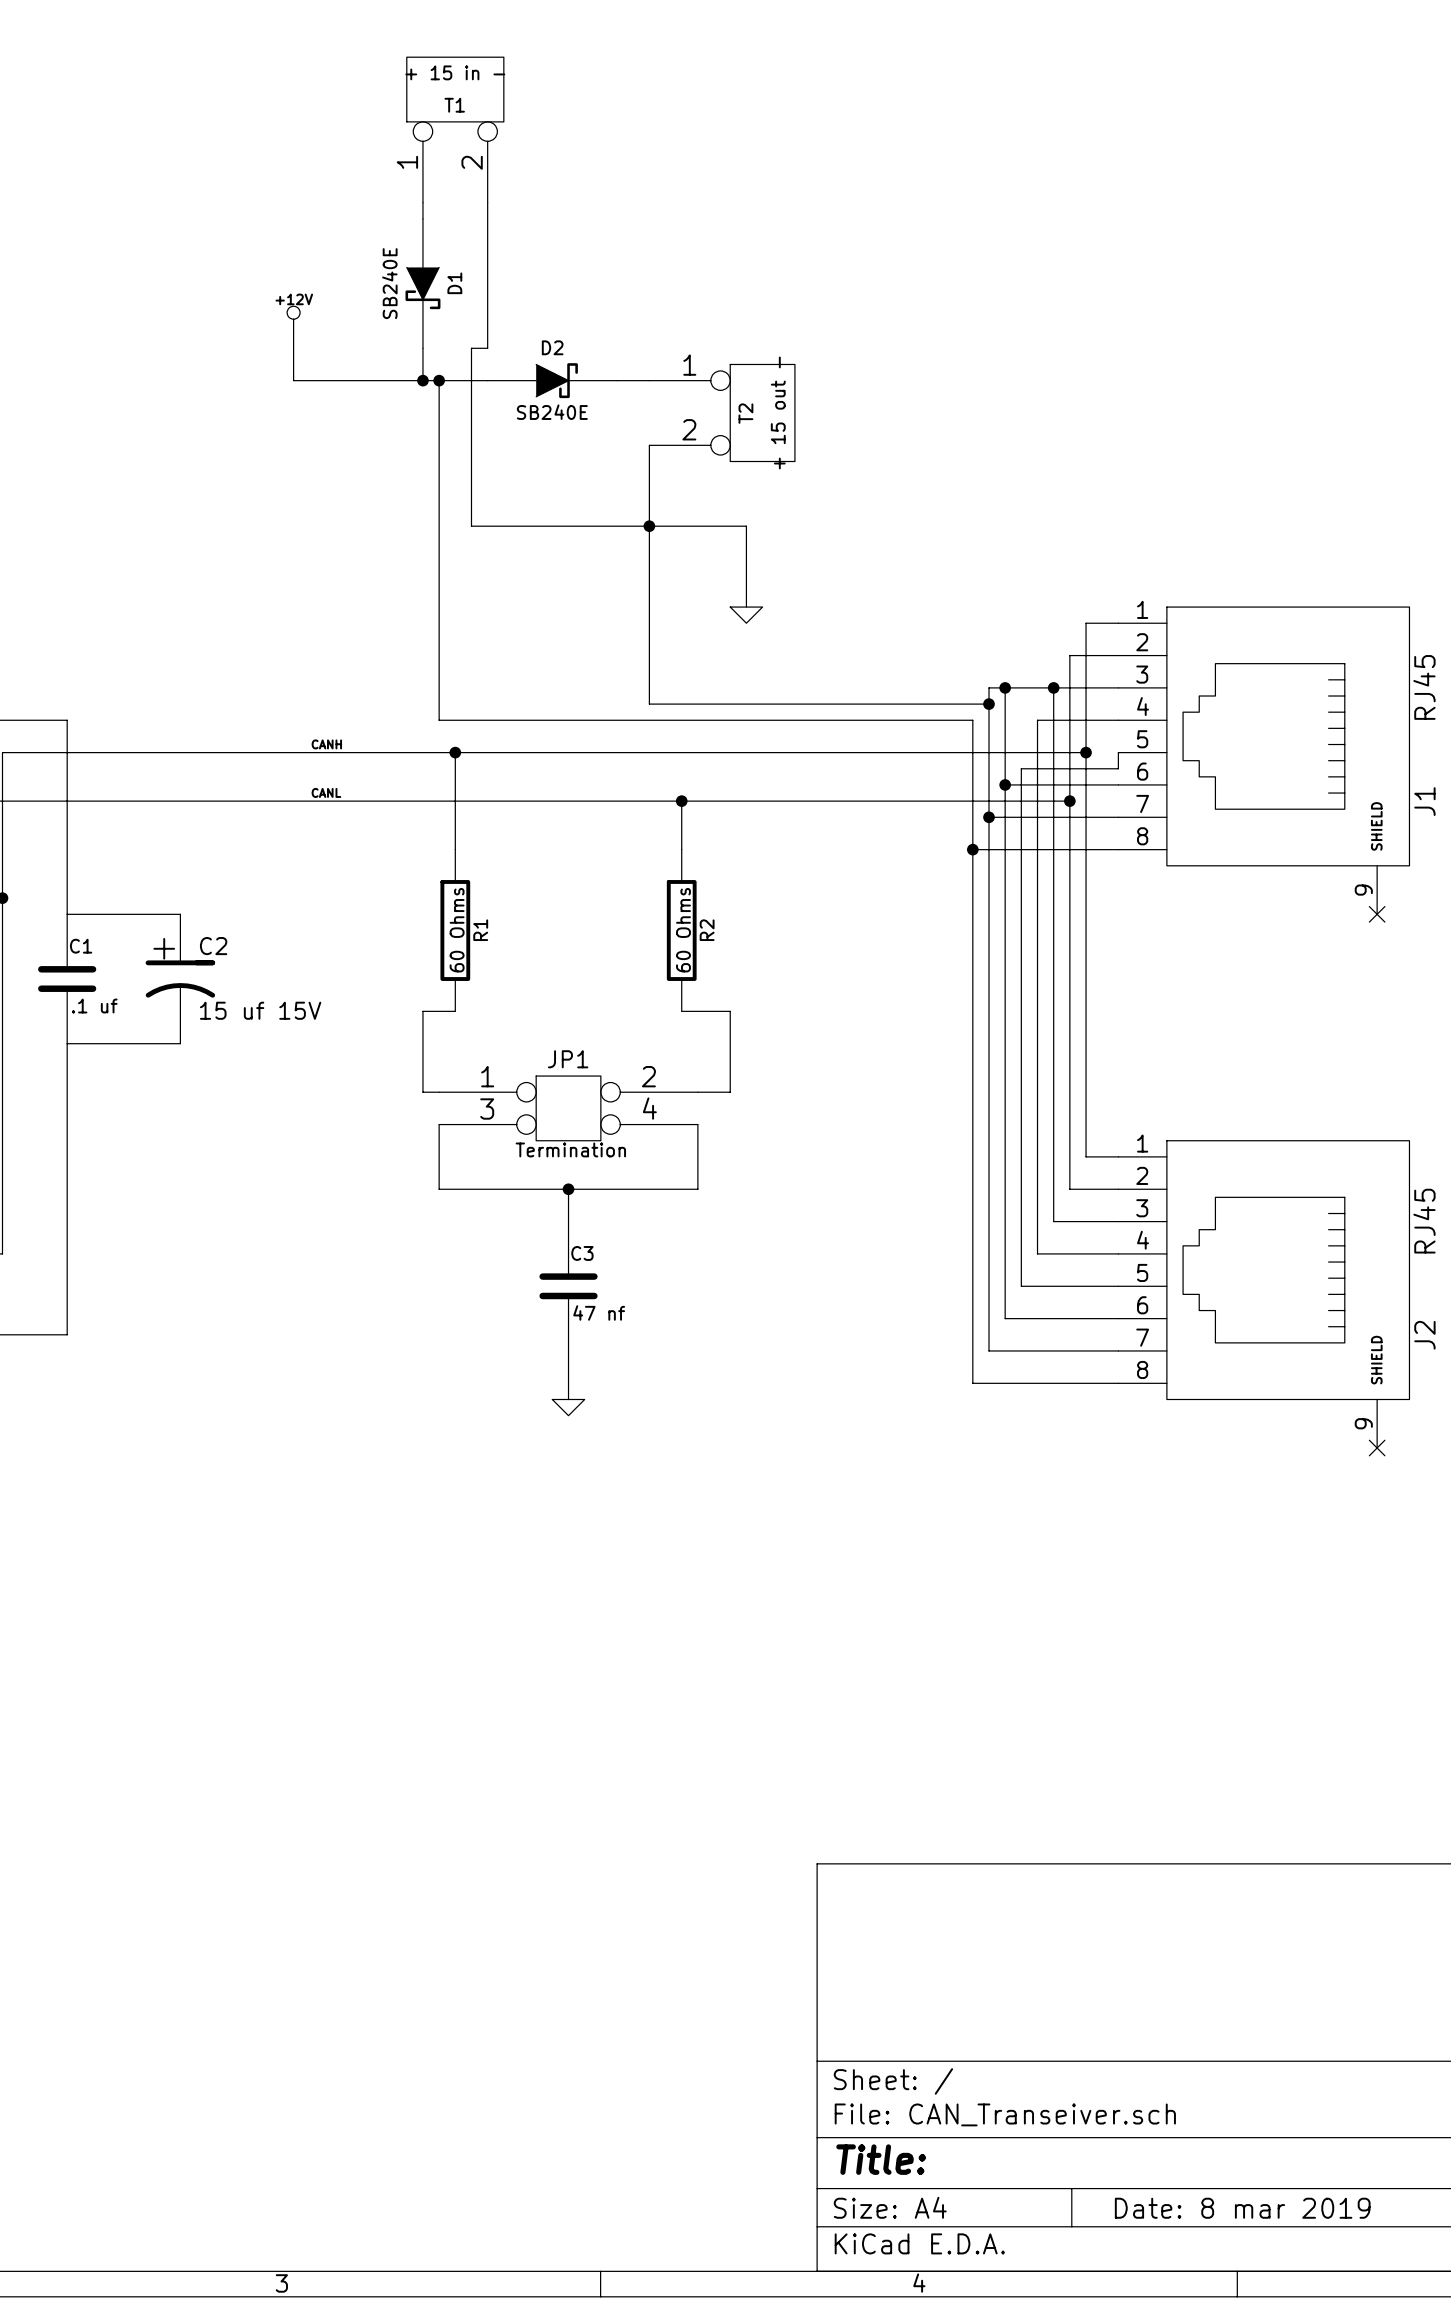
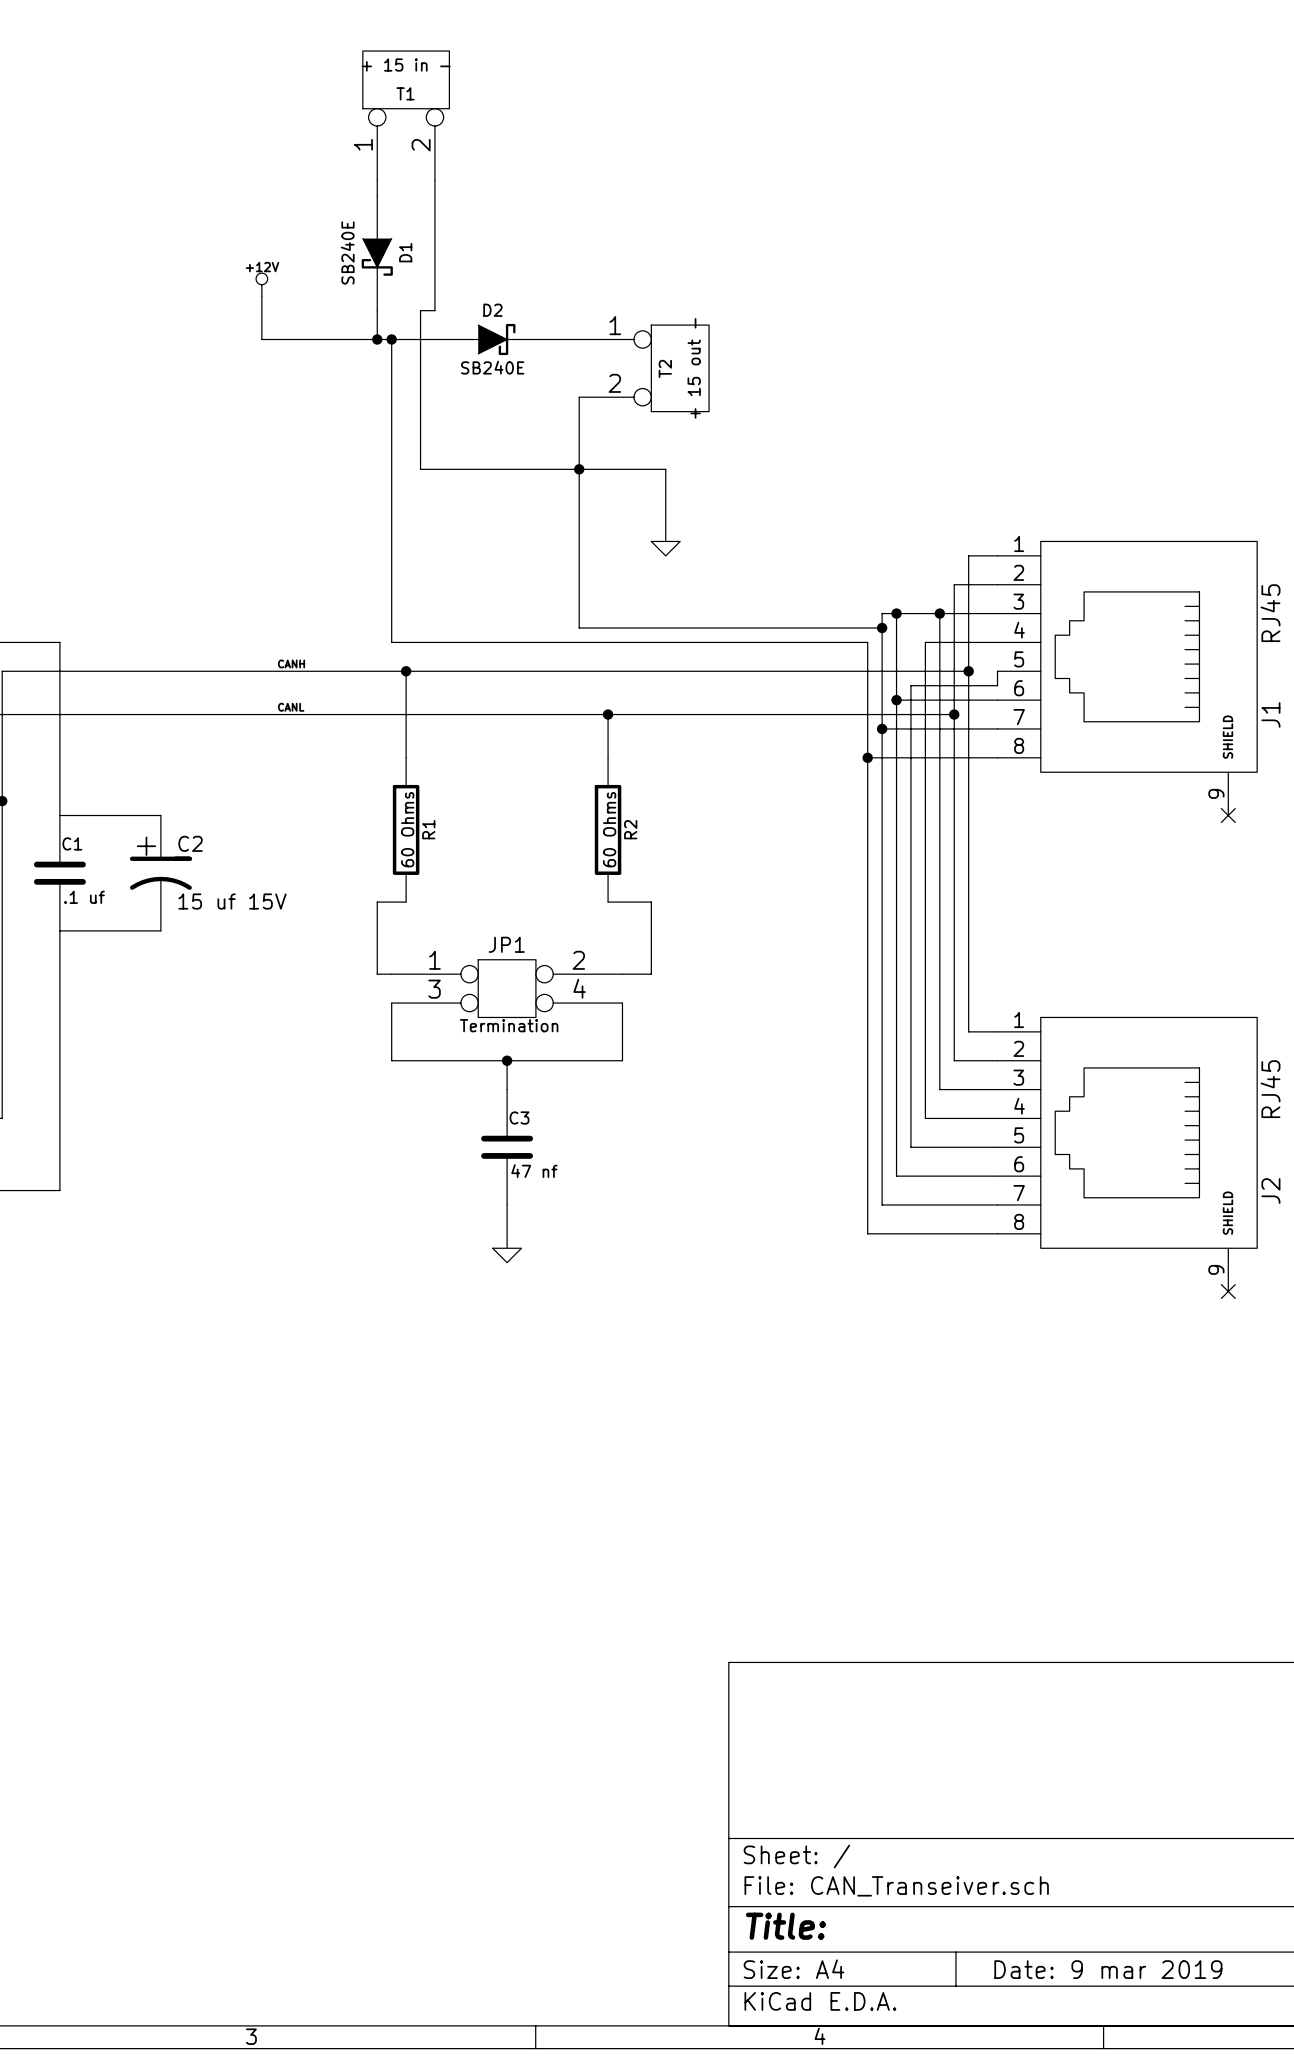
title block: Date: 8 mar 2019 (1242, 2208) -> Date: 9 mar 2019 (1108, 1969)

